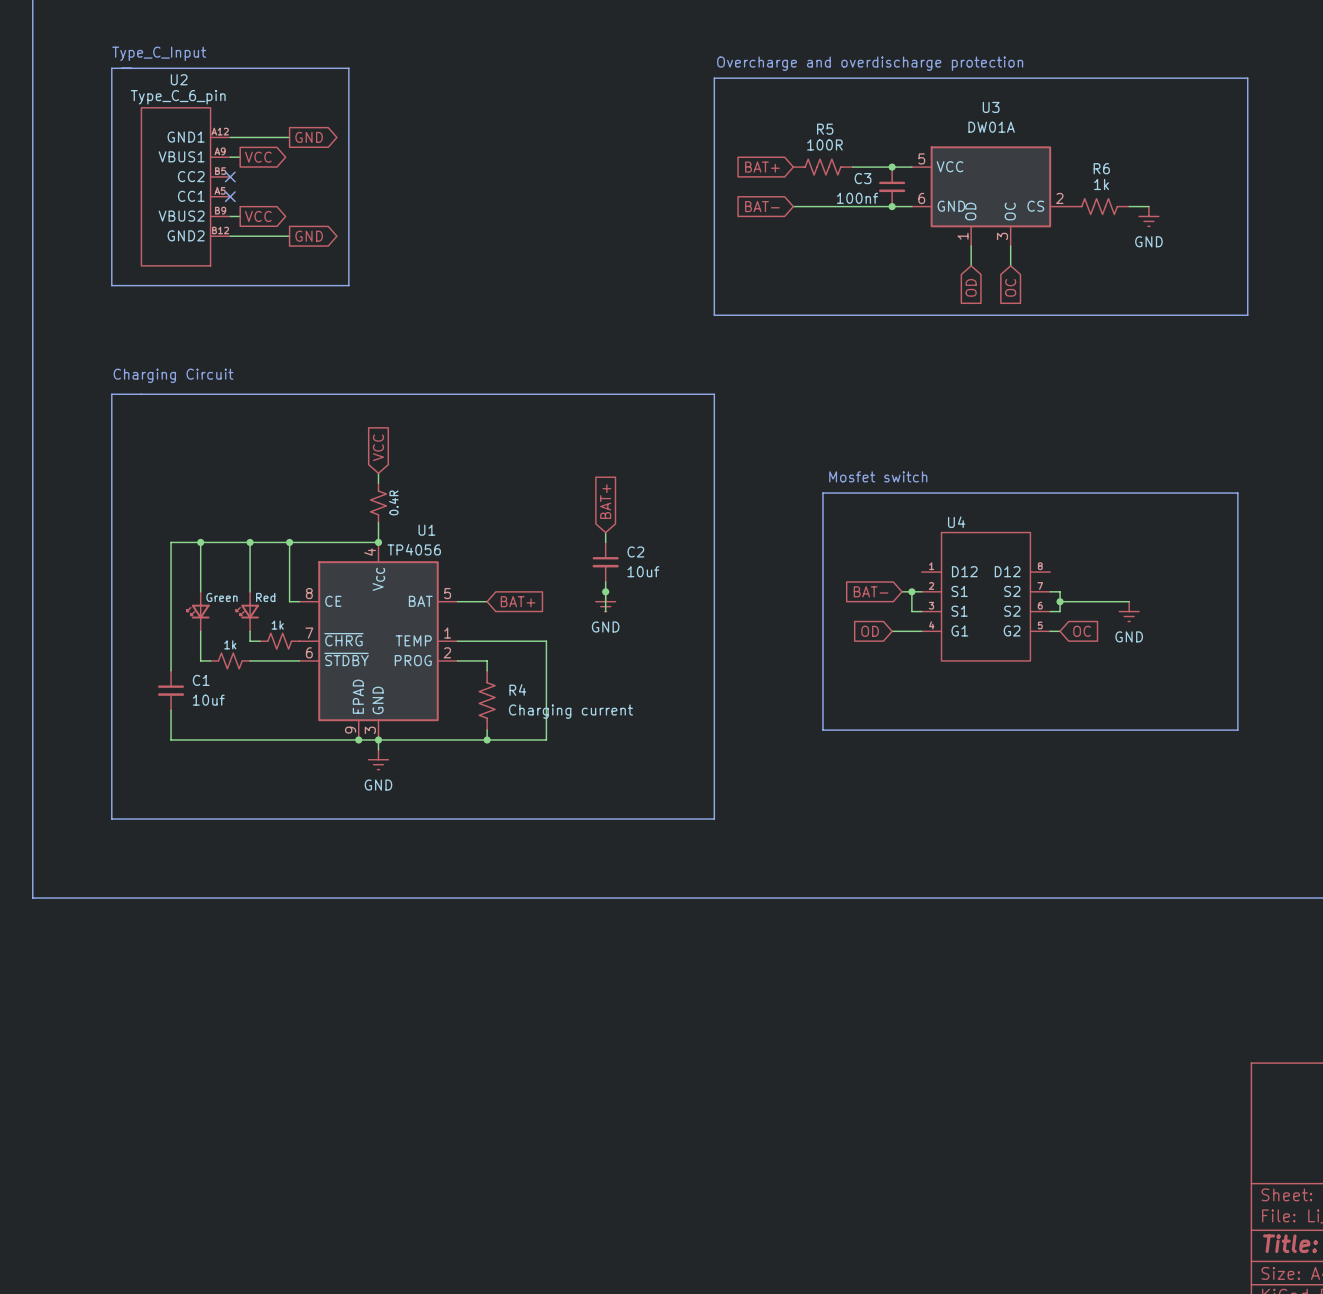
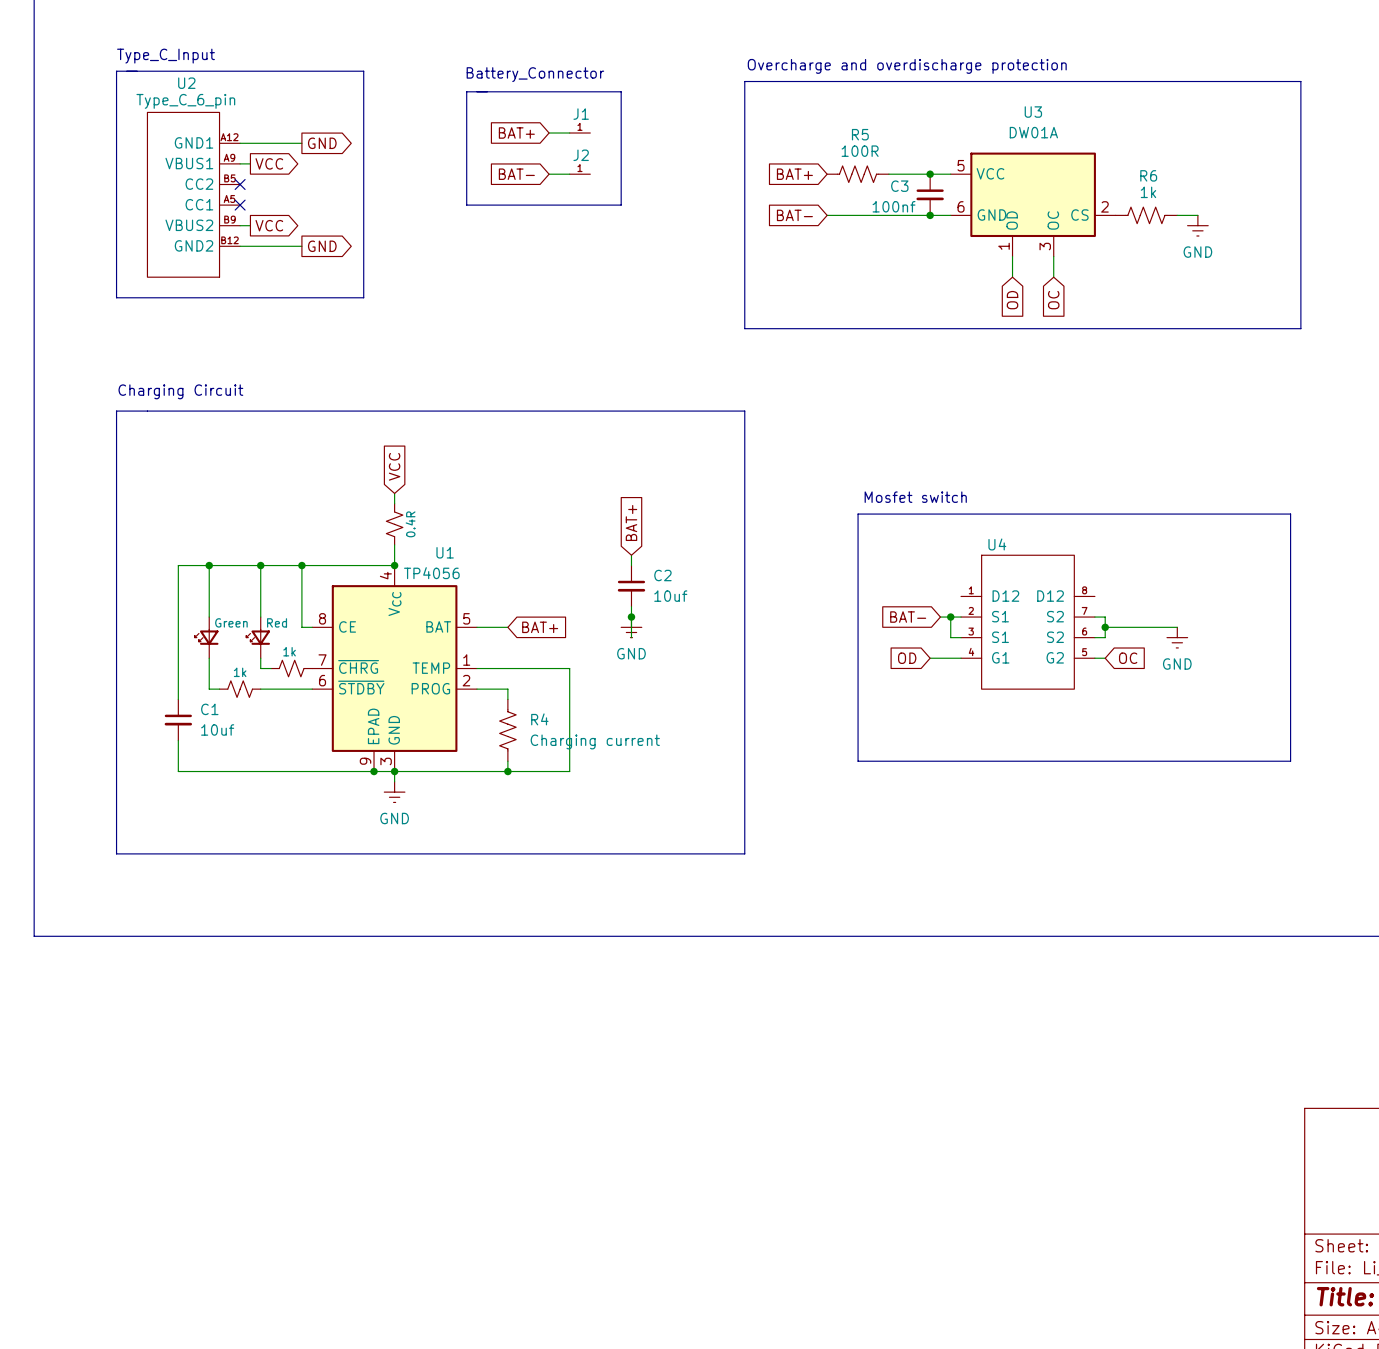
text: none -> Battery_Connector (535, 74)
line: none -> (466, 91) (466, 205) (621, 205) (621, 91) (466, 91)
global label: none -> BAT+ (516, 133)
wire: none -> (549, 133) (569, 133)
J1: none -> (579, 133)
global label: none -> BAT- (516, 174)
wire: none -> (549, 174) (569, 174)
J2: none -> (579, 174)

